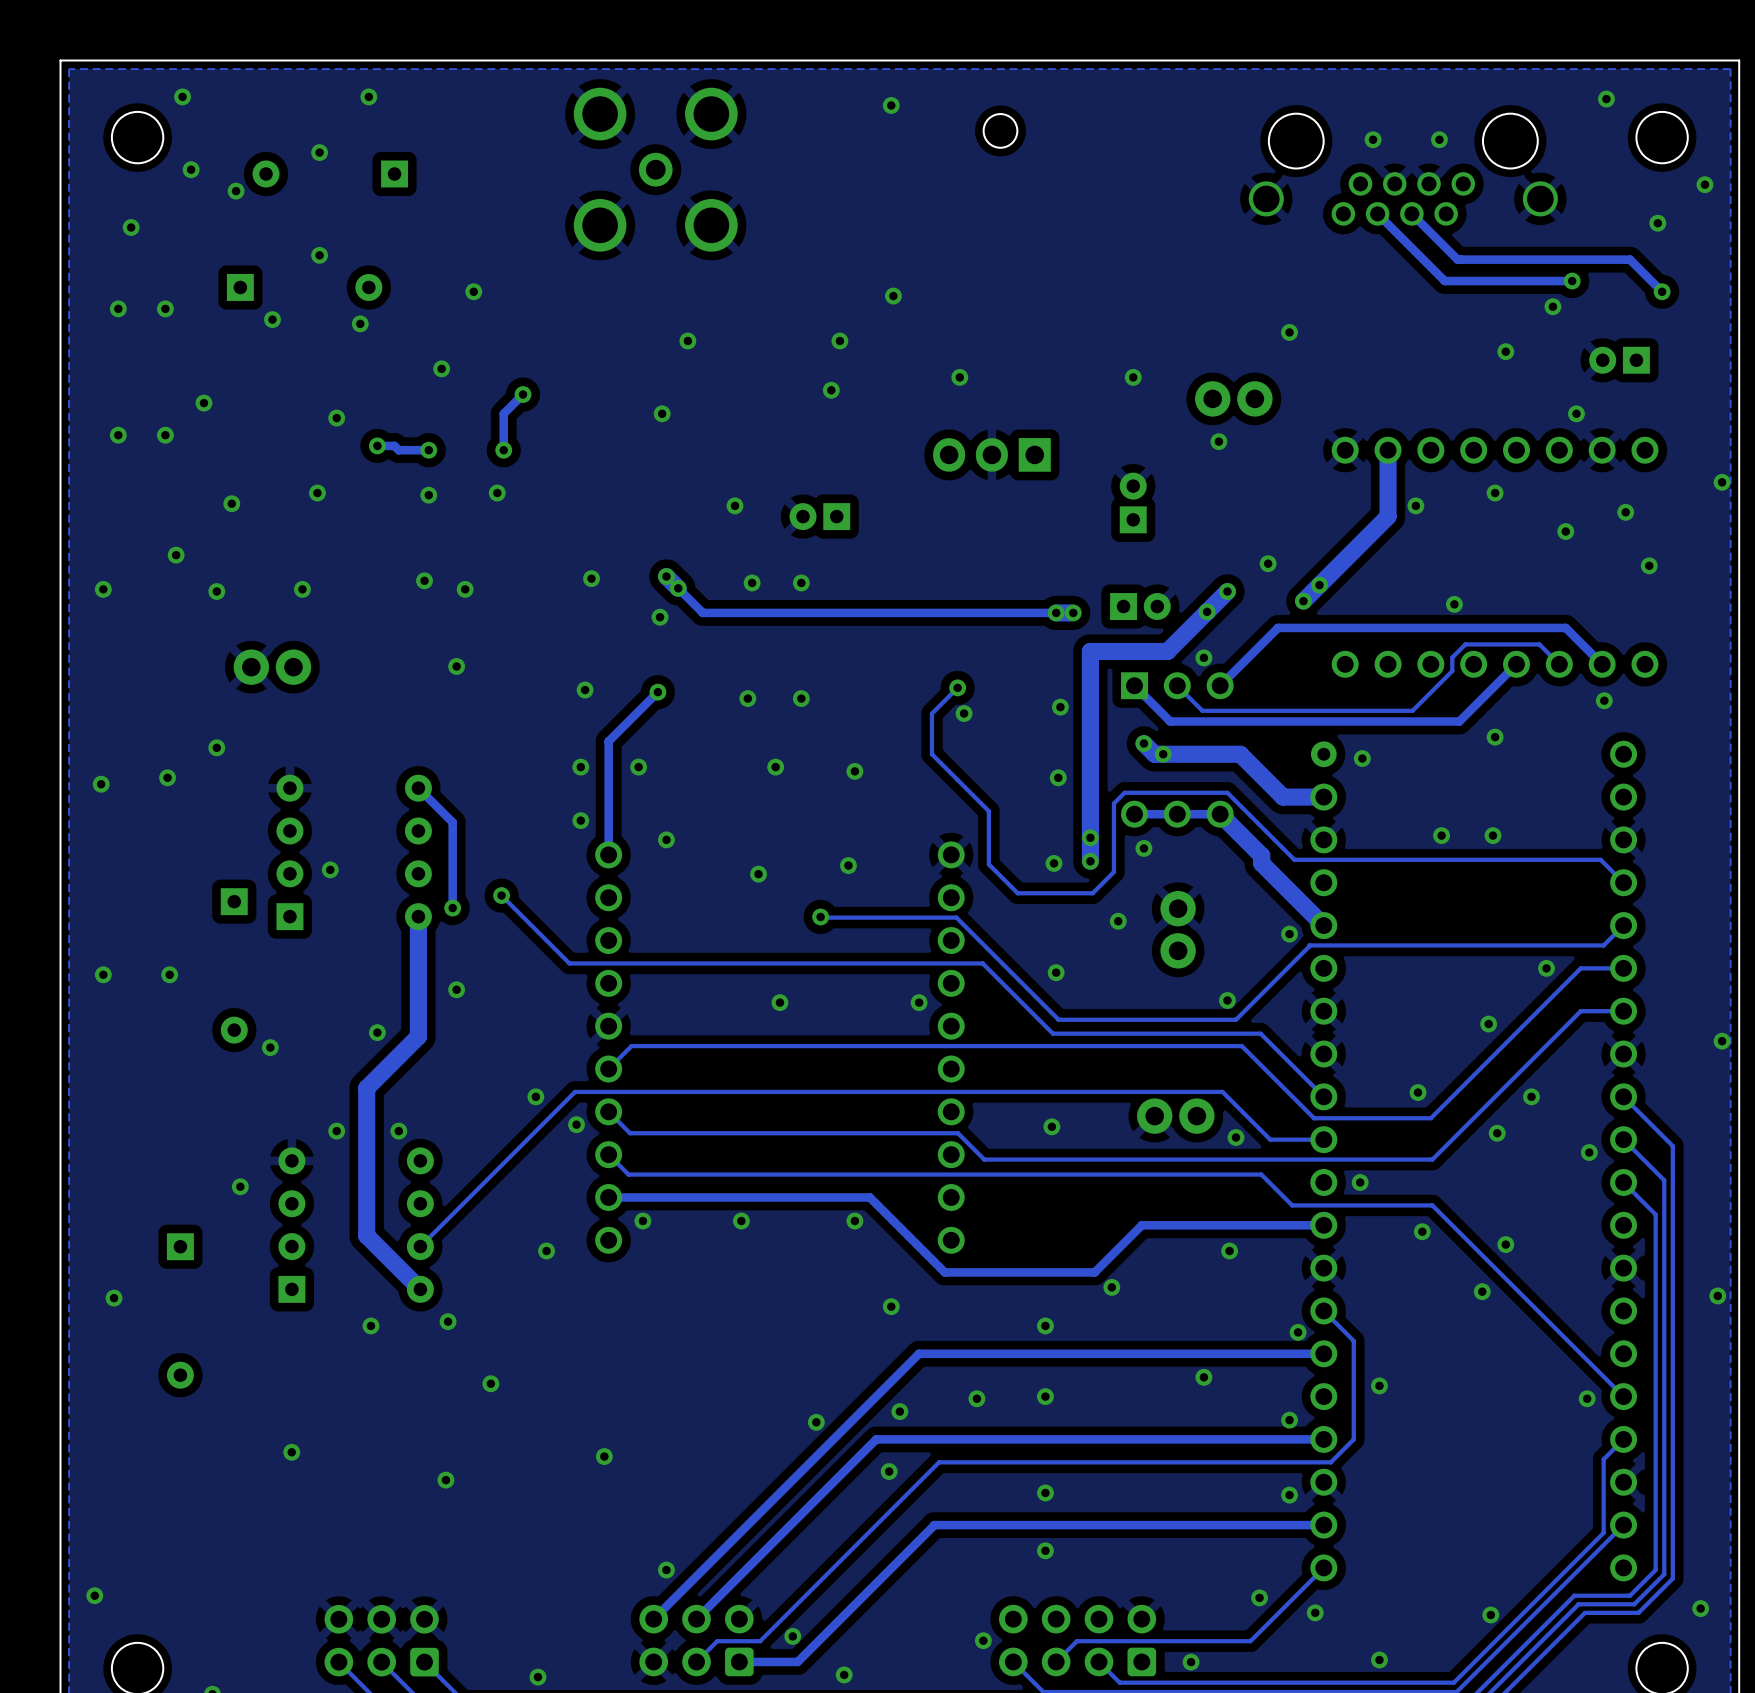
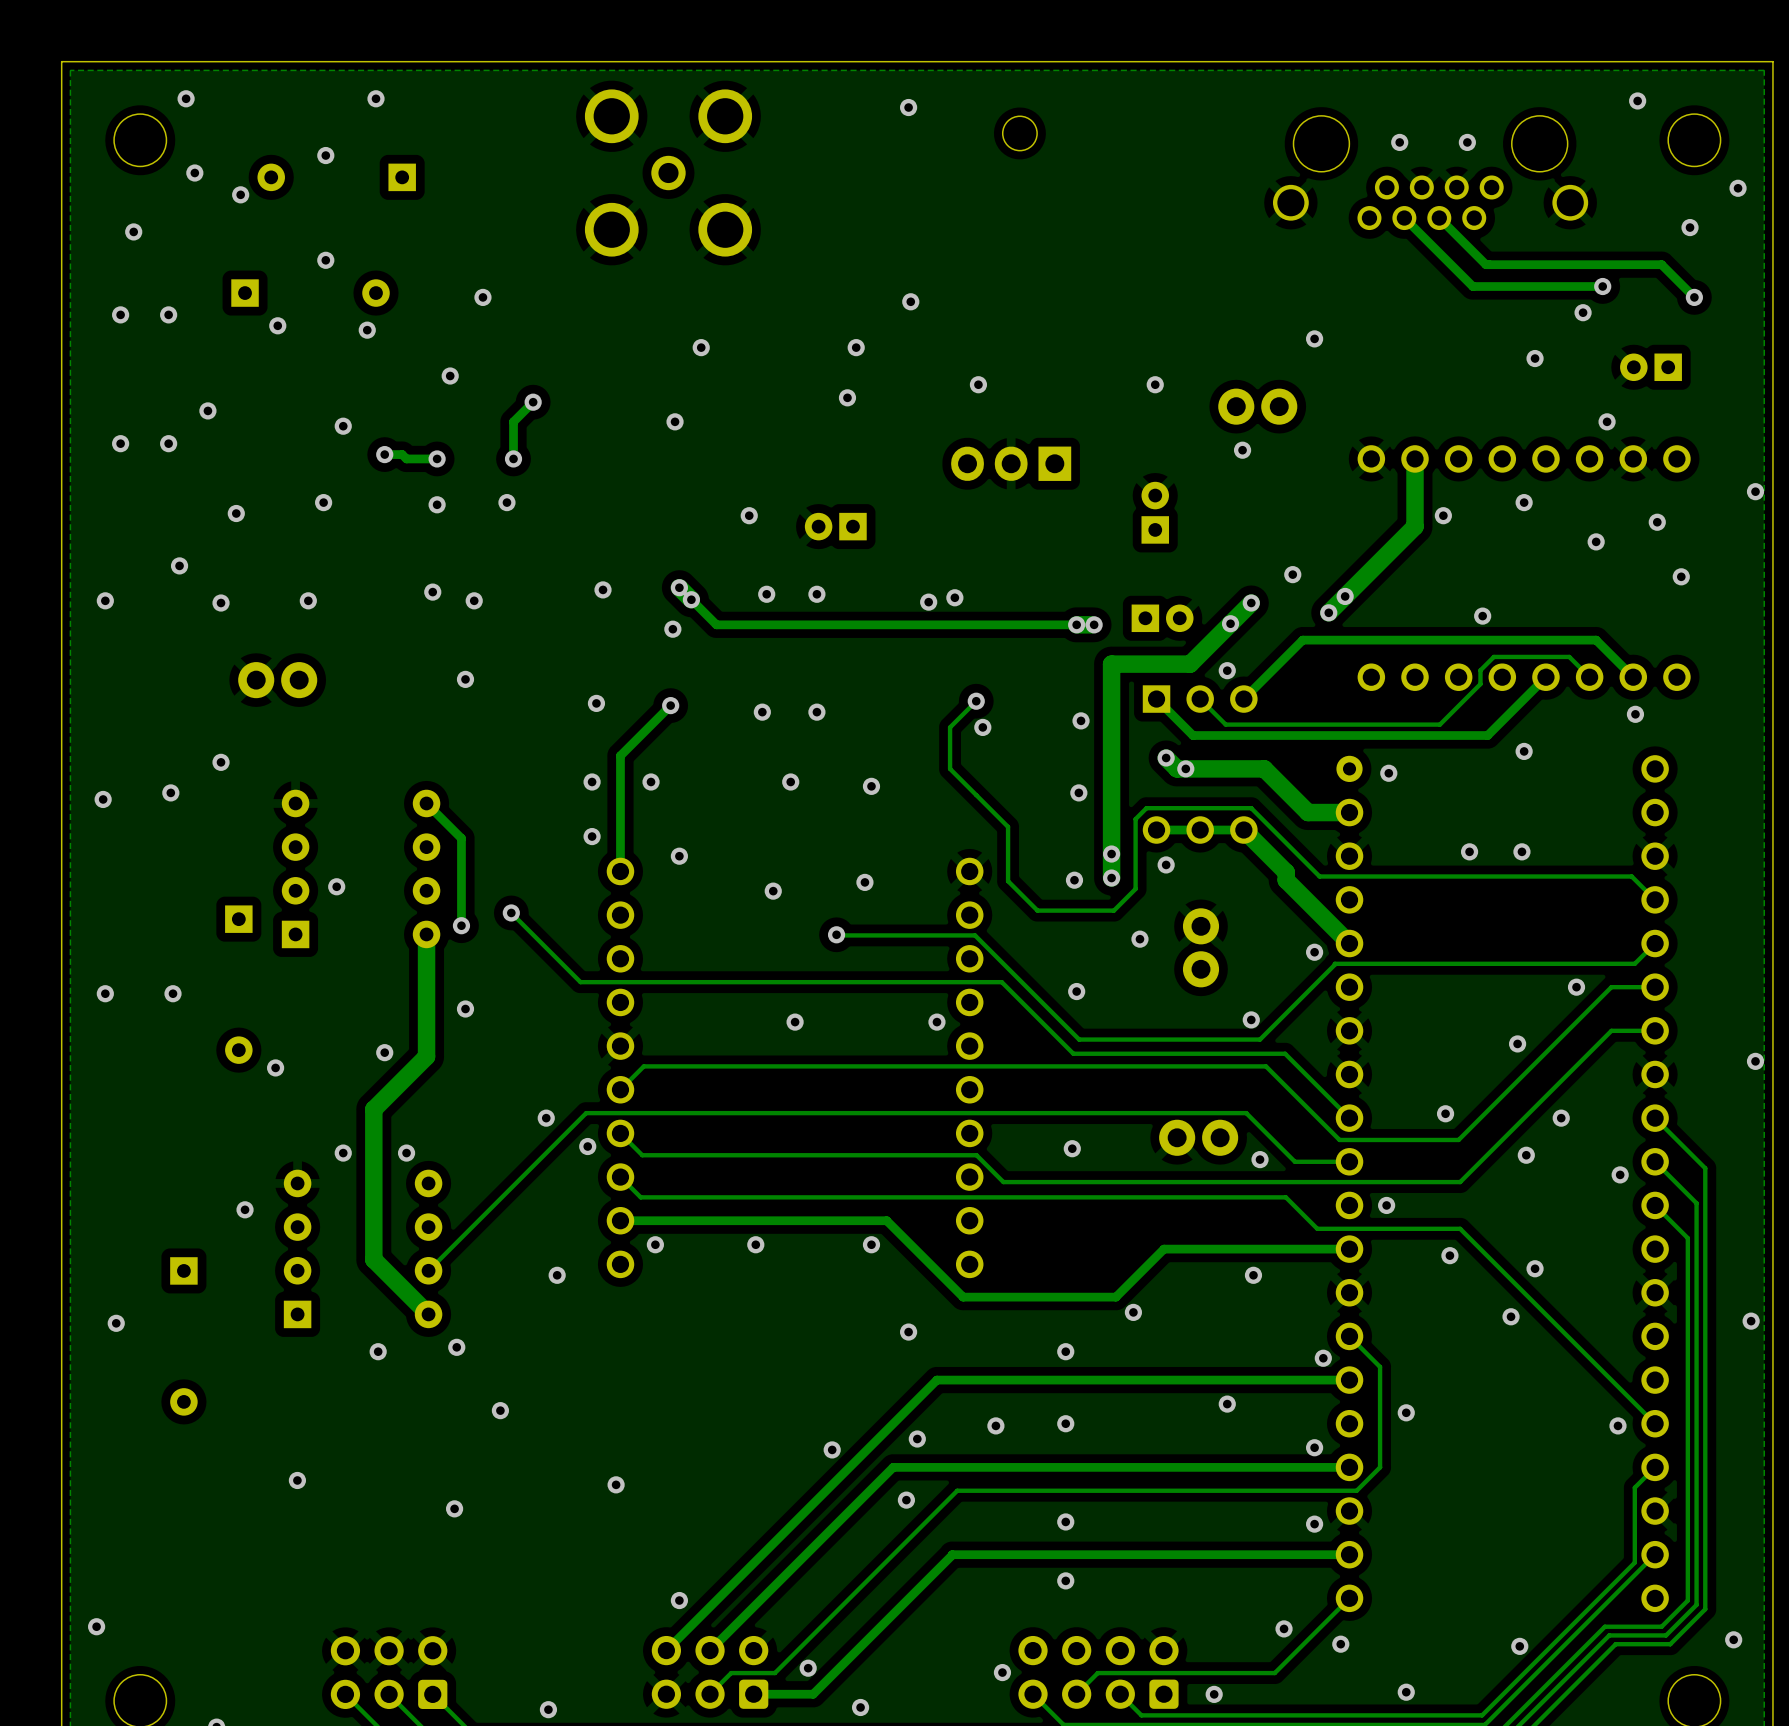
via: none -> (954, 597)
via: none -> (928, 602)

